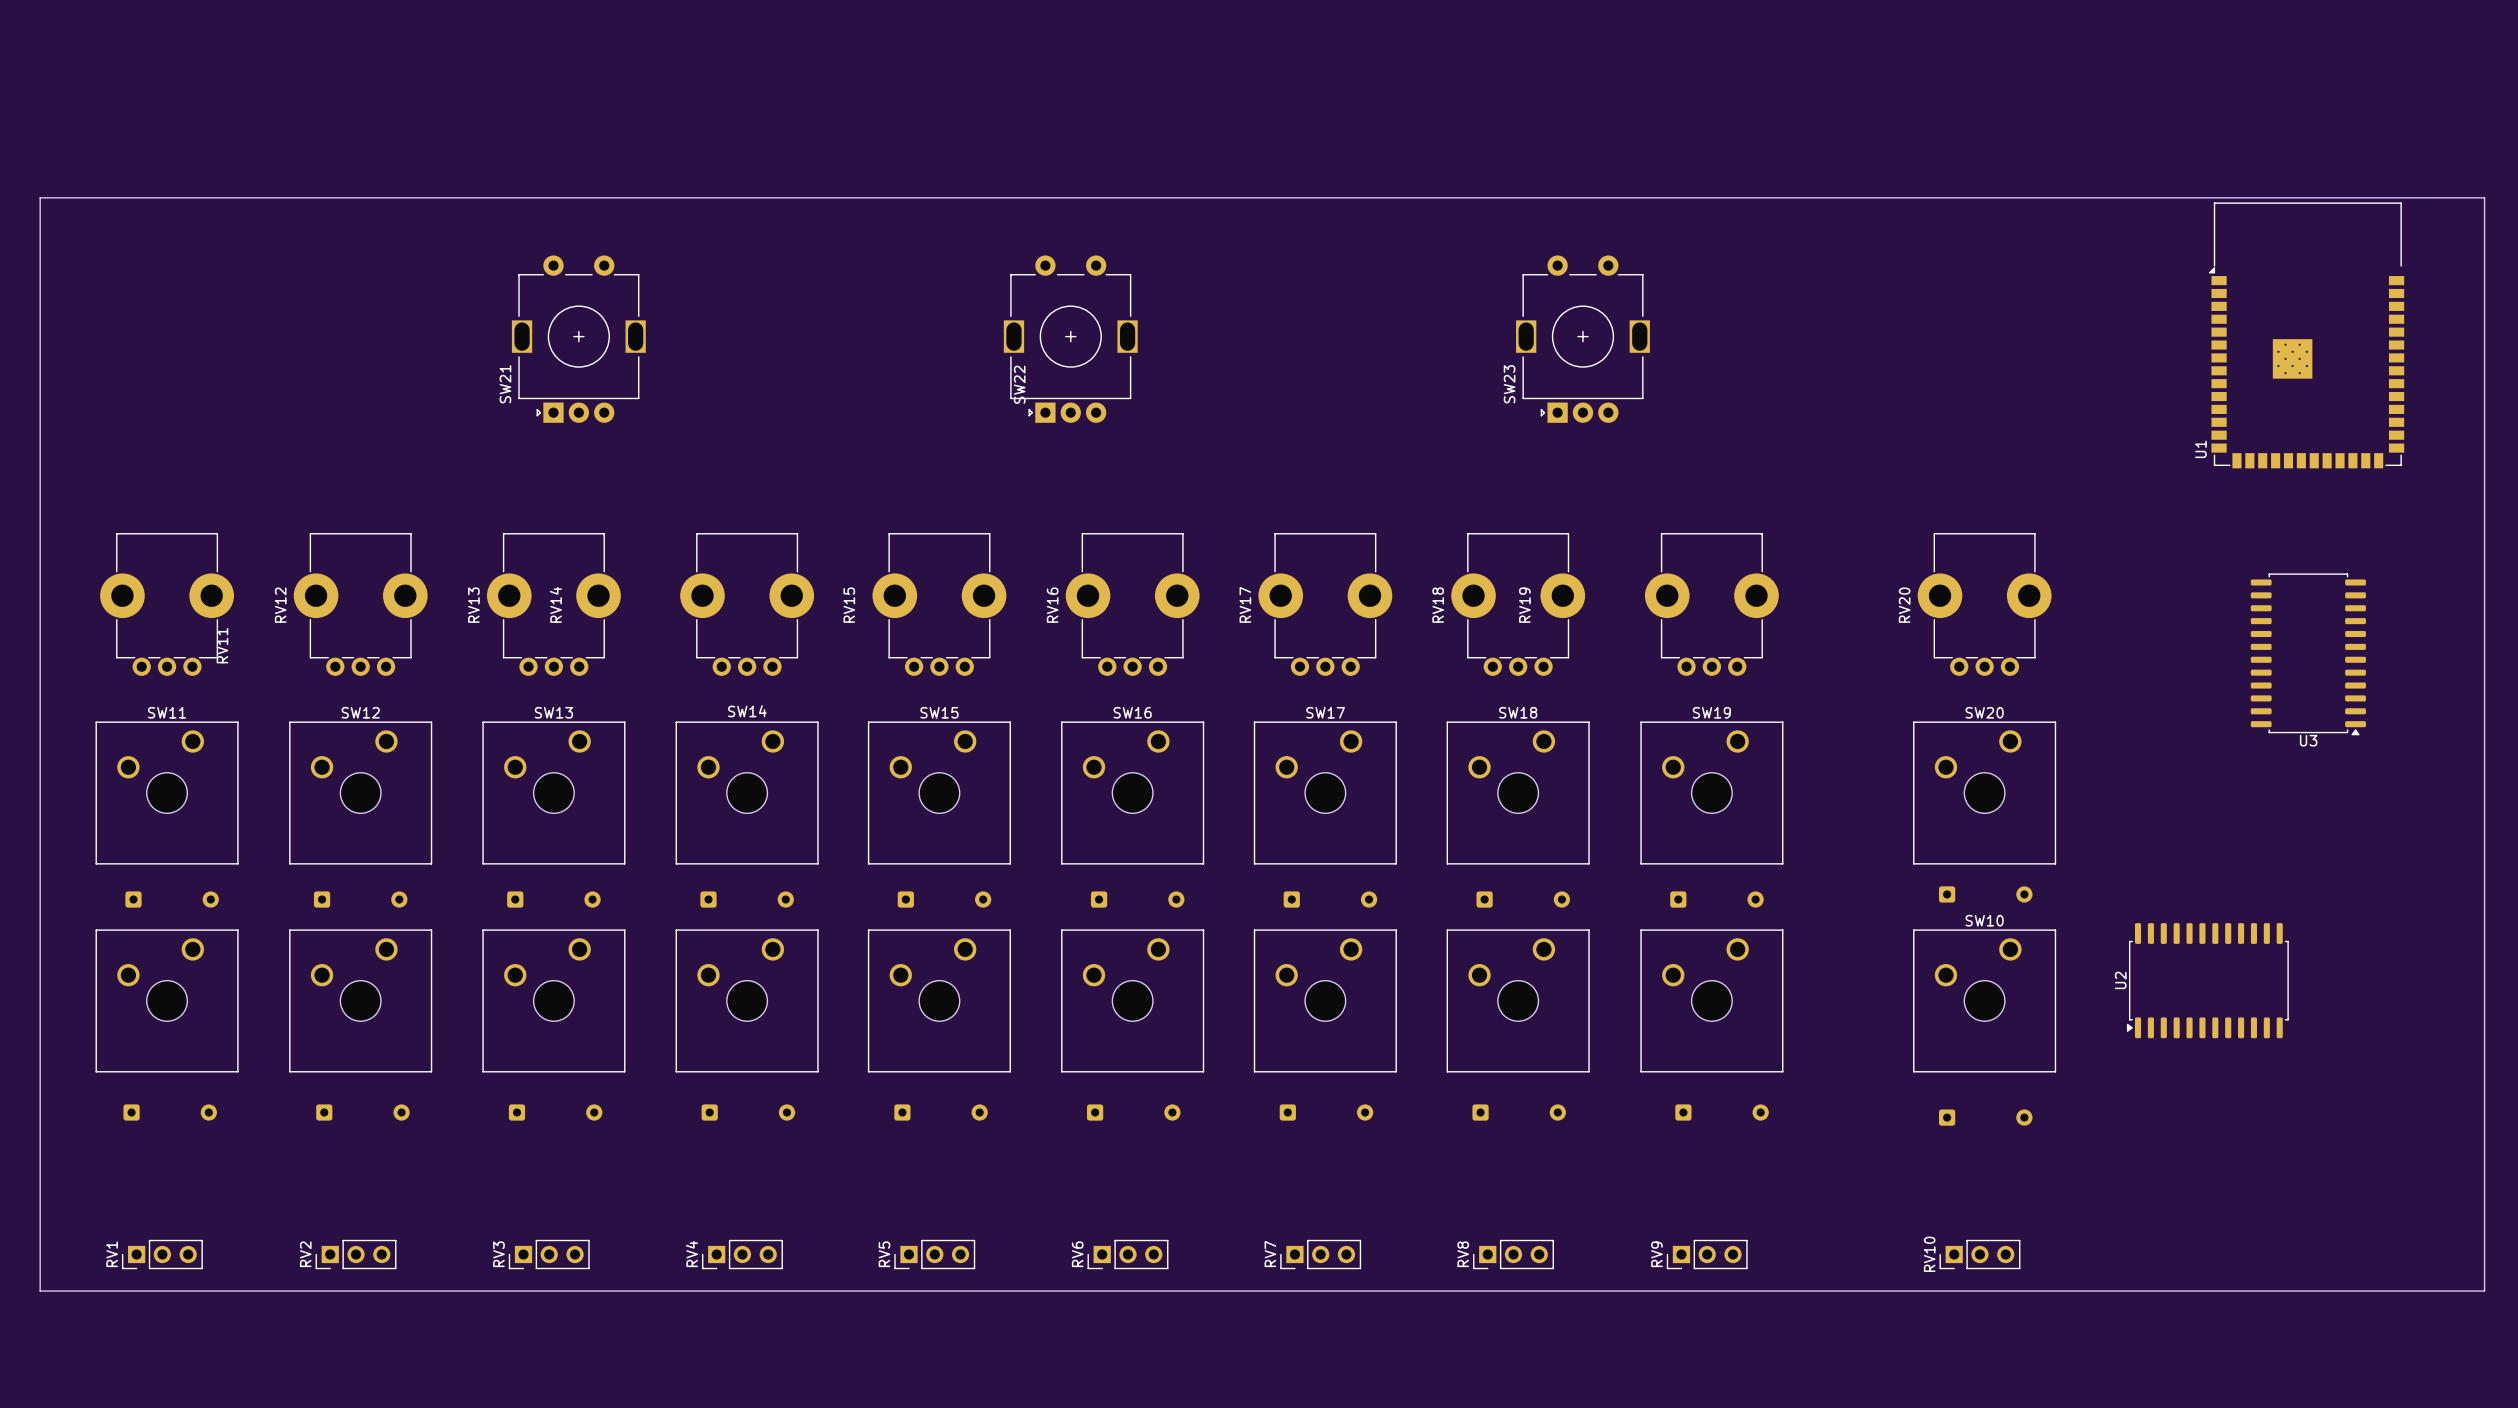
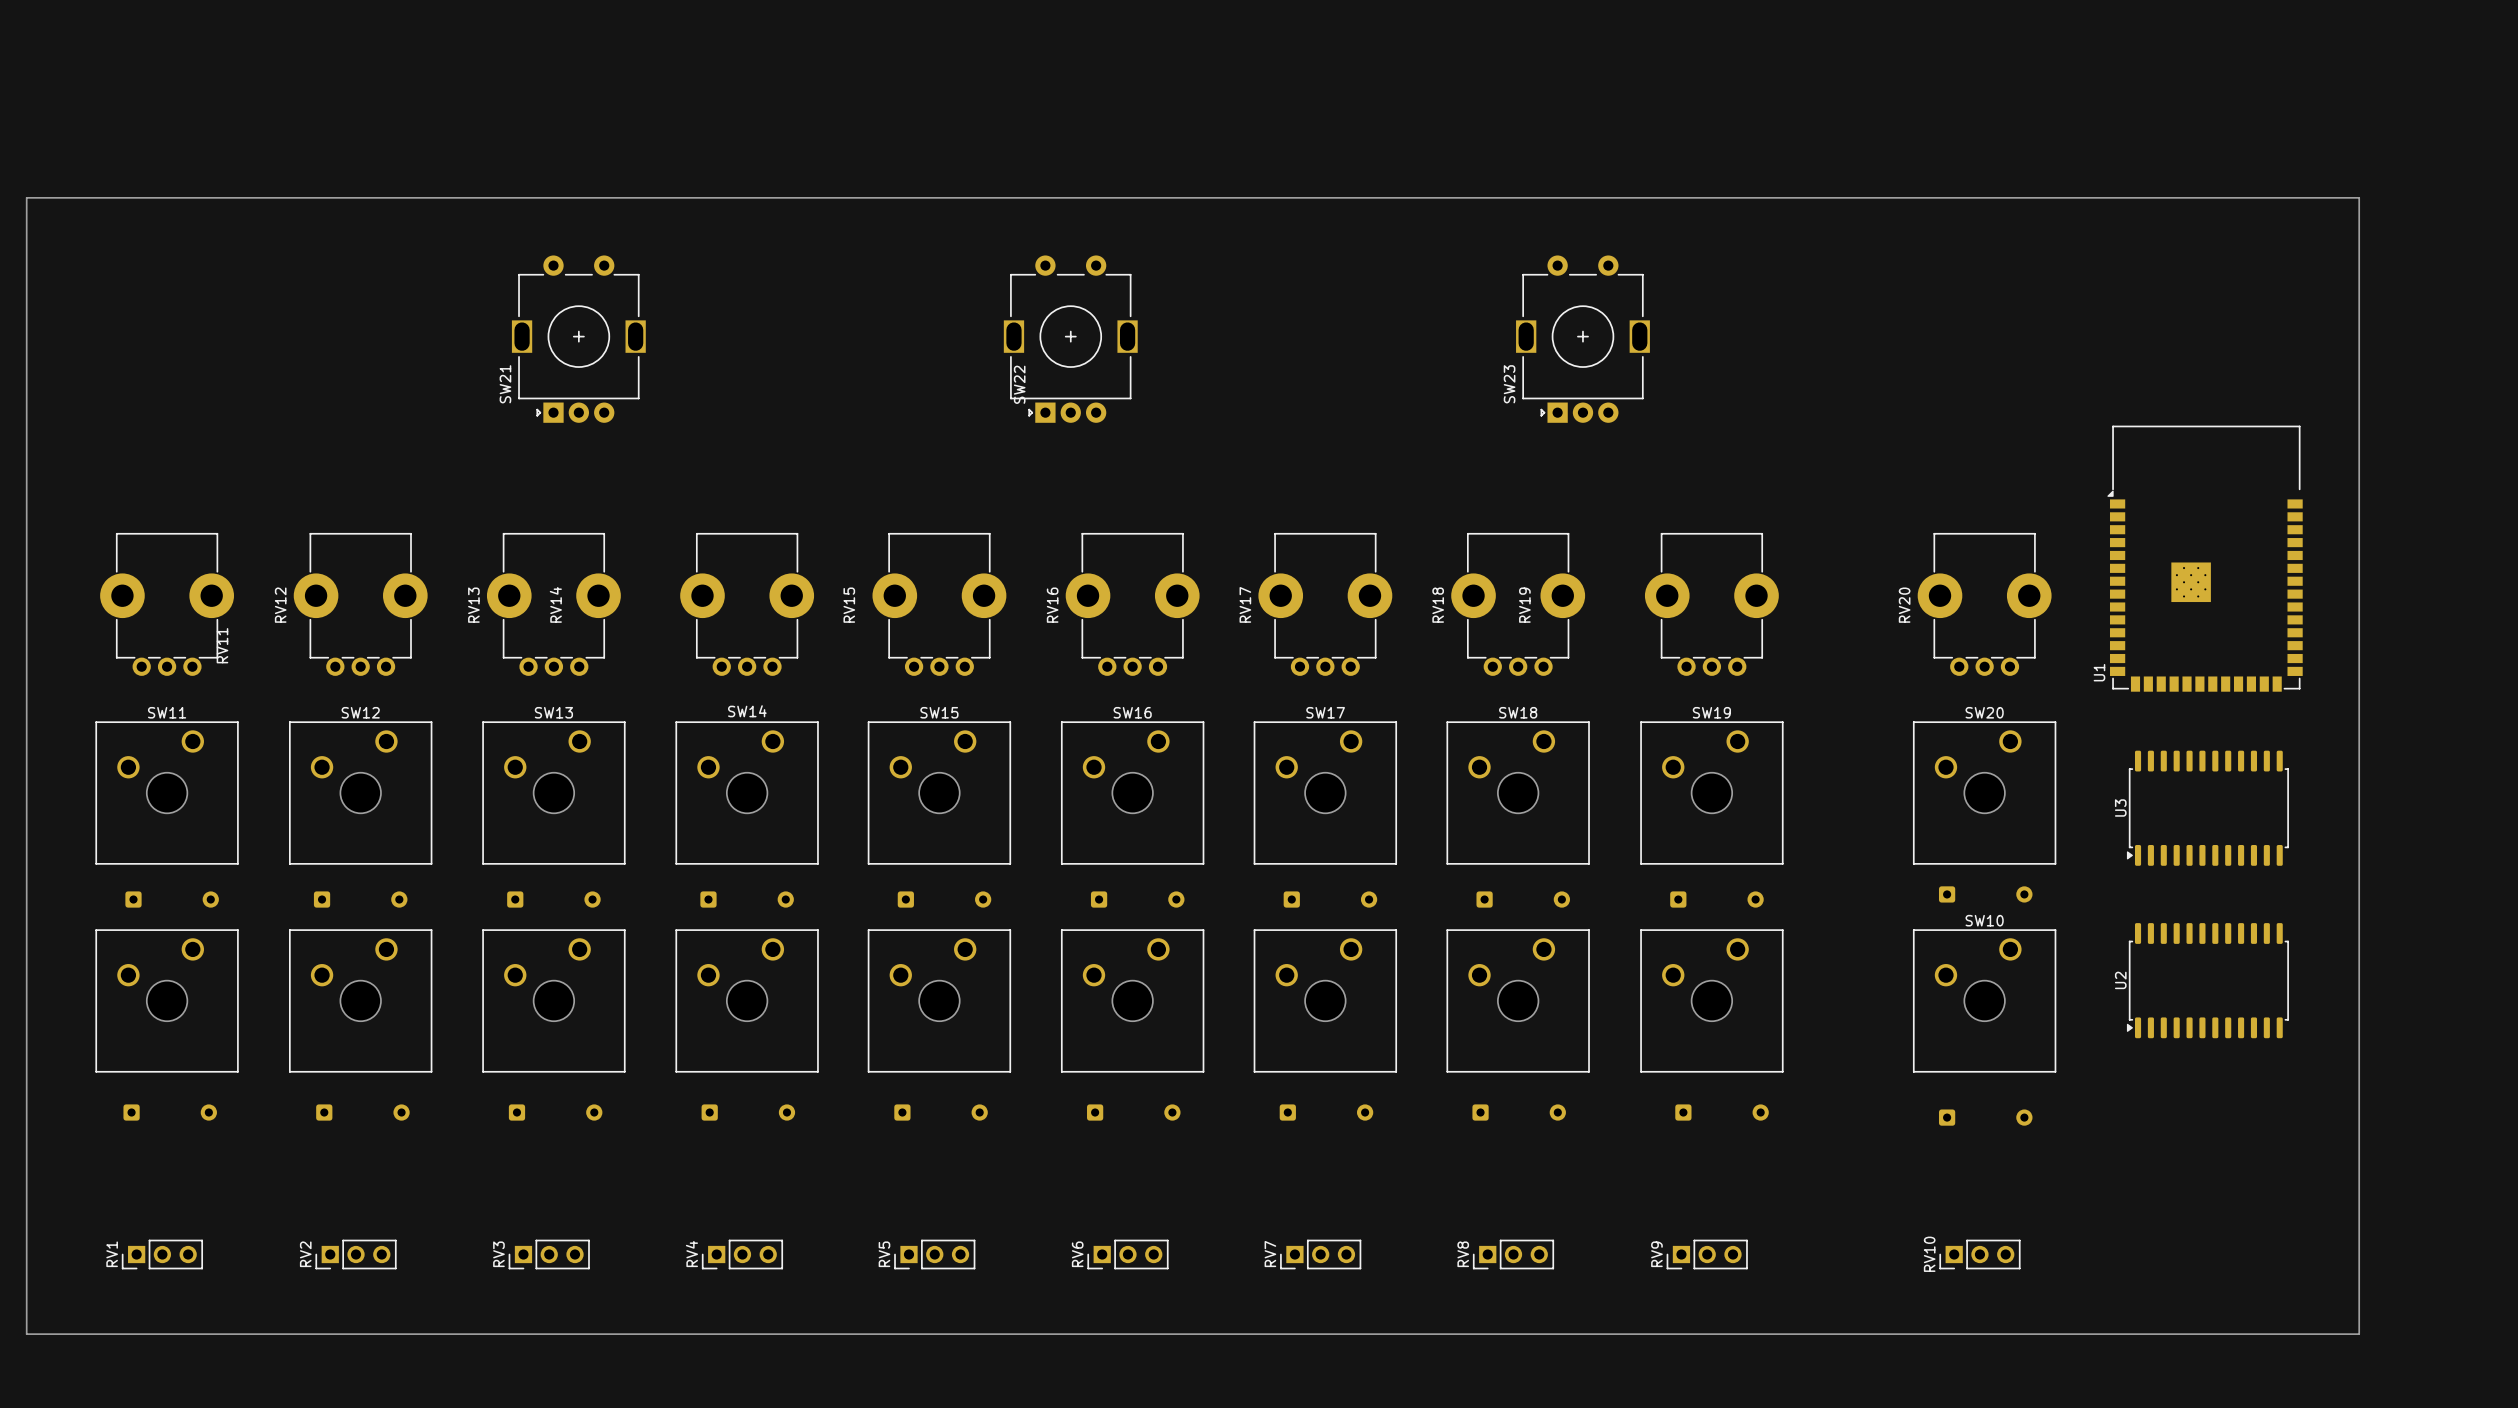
board edge: (40, 197) (40, 1291) (2484, 1291) (2484, 197) (2359, 197) -> (40, 197) (26, 197) (26, 1334) (2359, 1334) (2359, 197)
U1 position: (2306, 335) -> (2205, 558)
U3 rotation: 0° (2308, 654) -> 90° clockwise (2207, 808)
U3 position: (2308, 654) -> (2207, 808)

